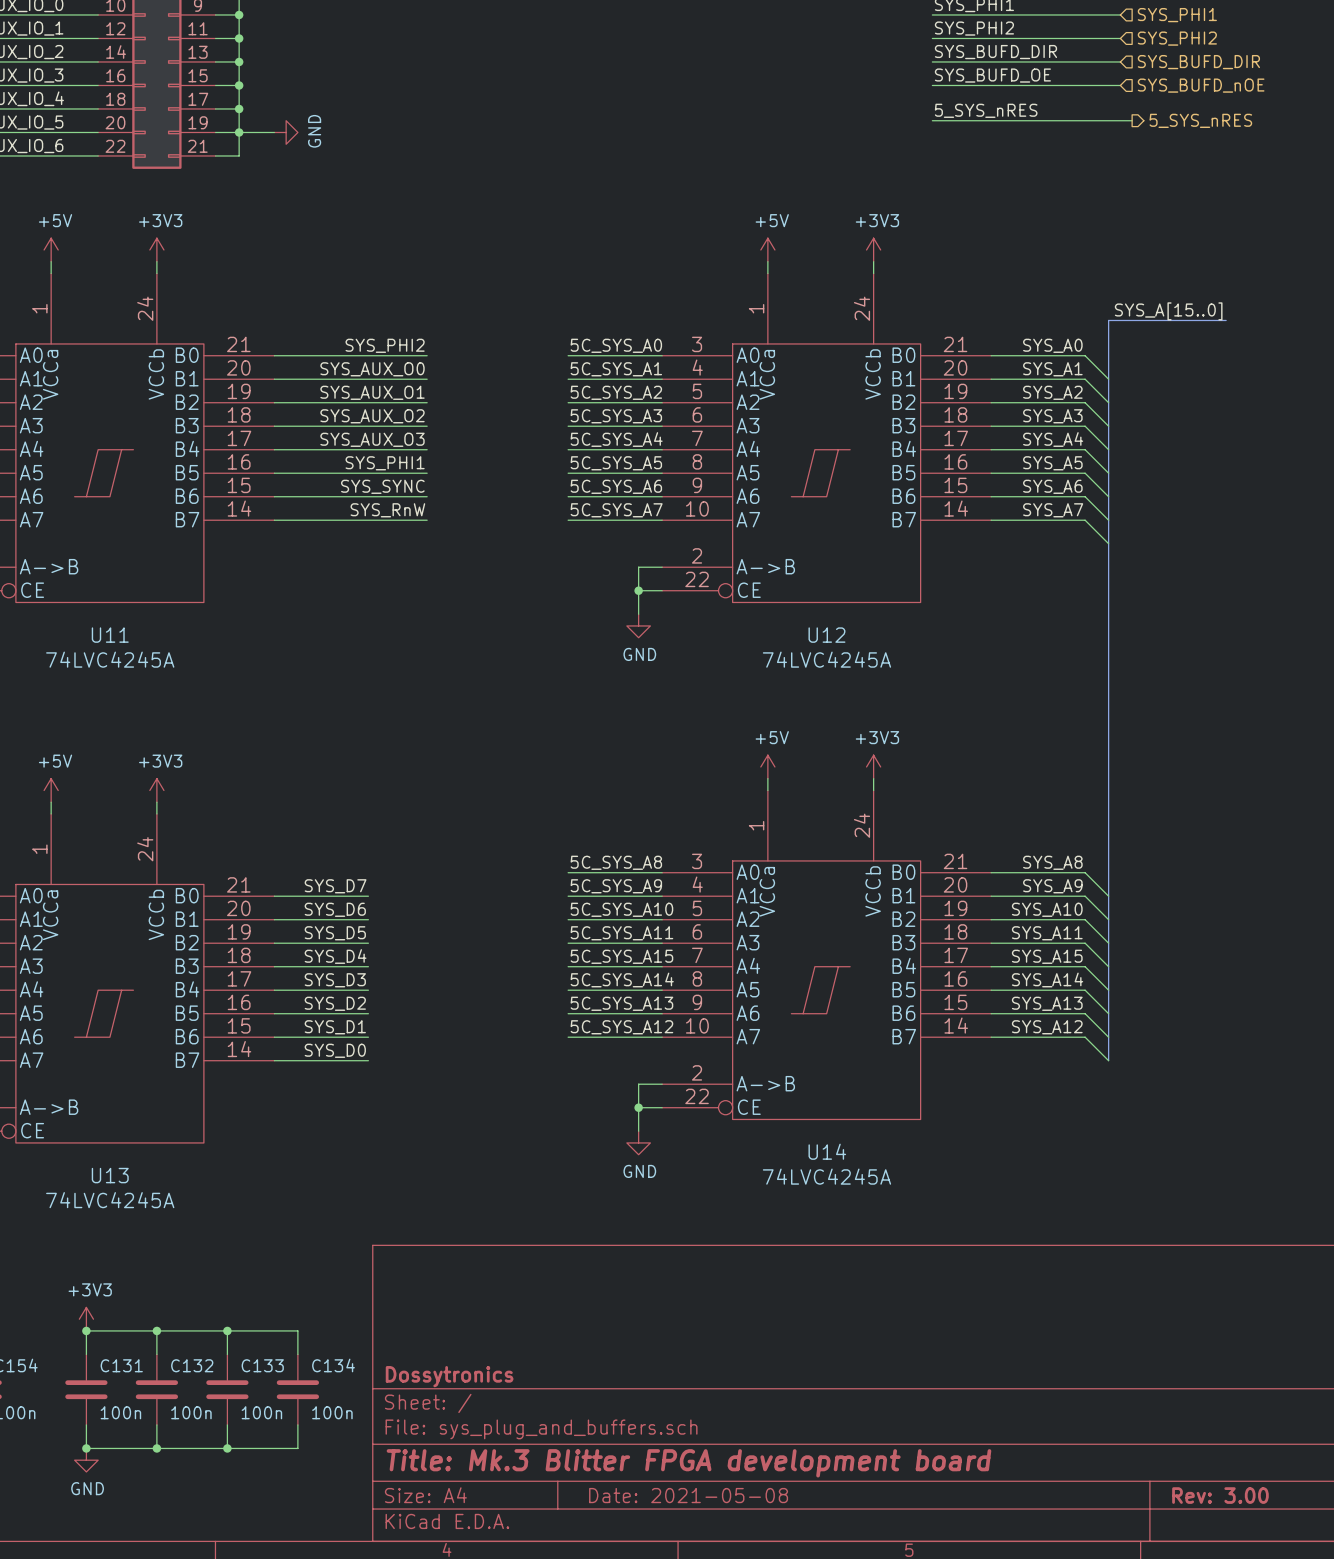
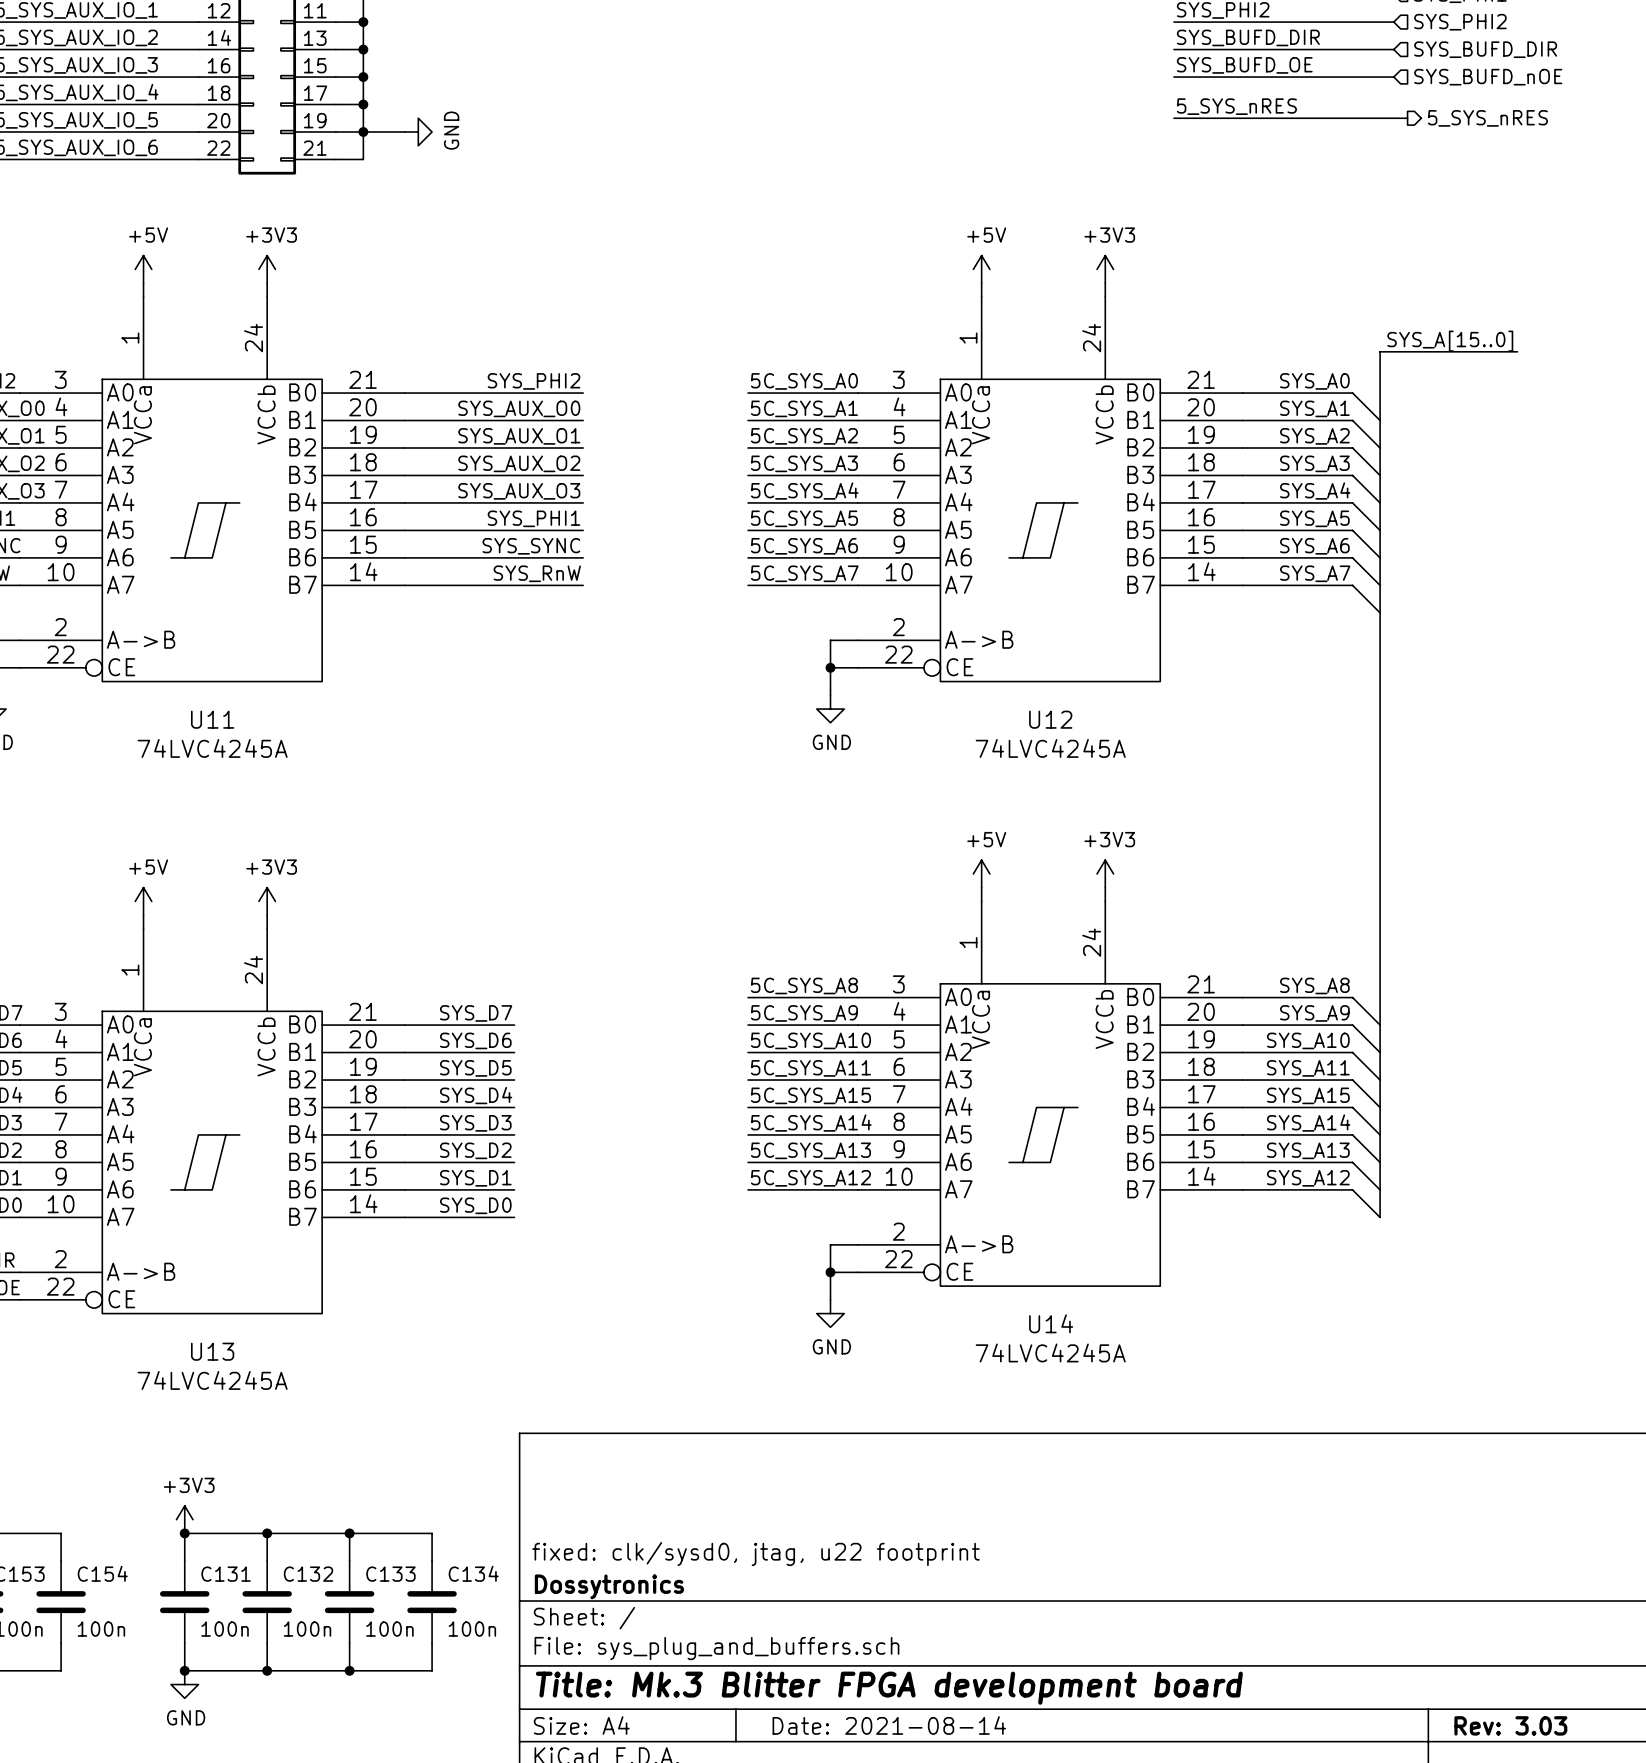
title block: none -> fixed: clk/sysd0, jtag, u22 footprint (755, 1554)
title block: Date: 2021-05-08 (688, 1495) -> Date: 2021-08-14 (889, 1725)
title block: Rev: 3.00 (1220, 1495) -> Rev: 3.03 (1510, 1725)

